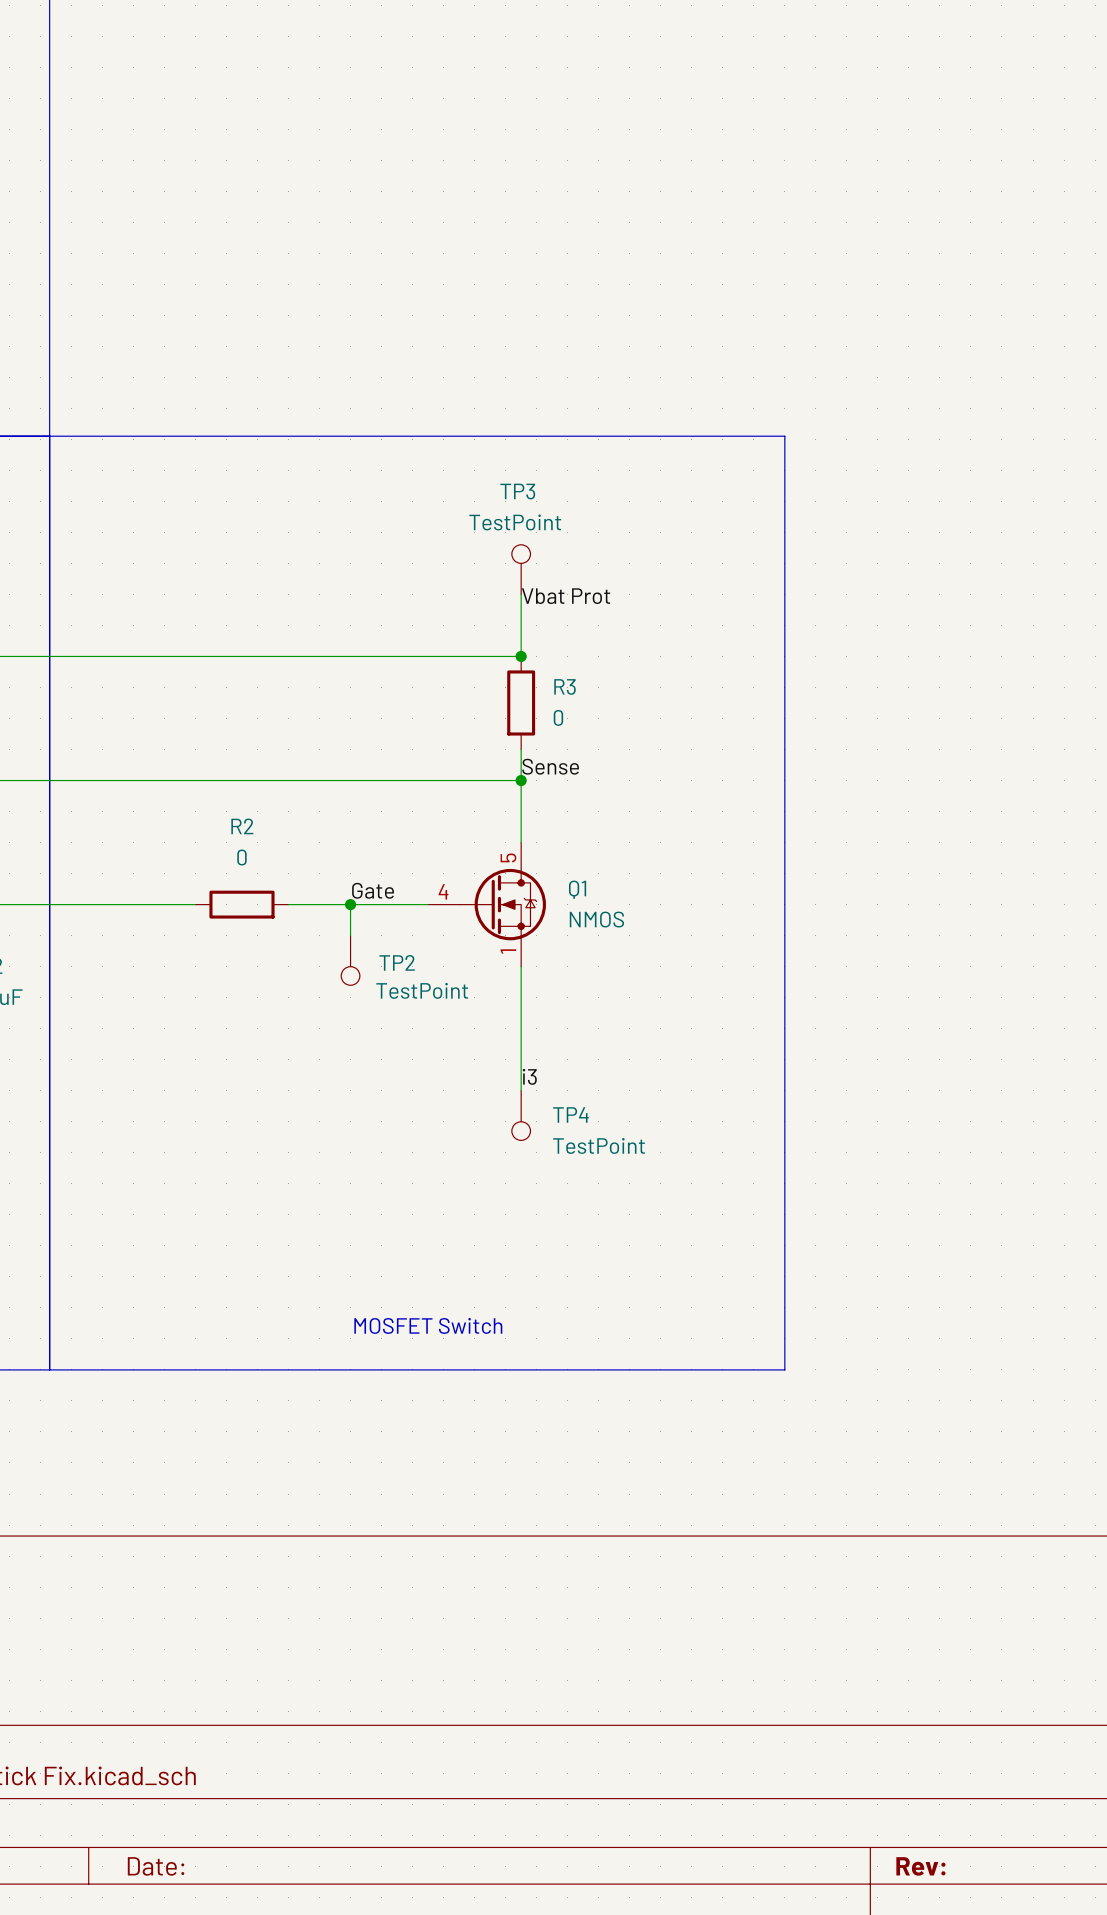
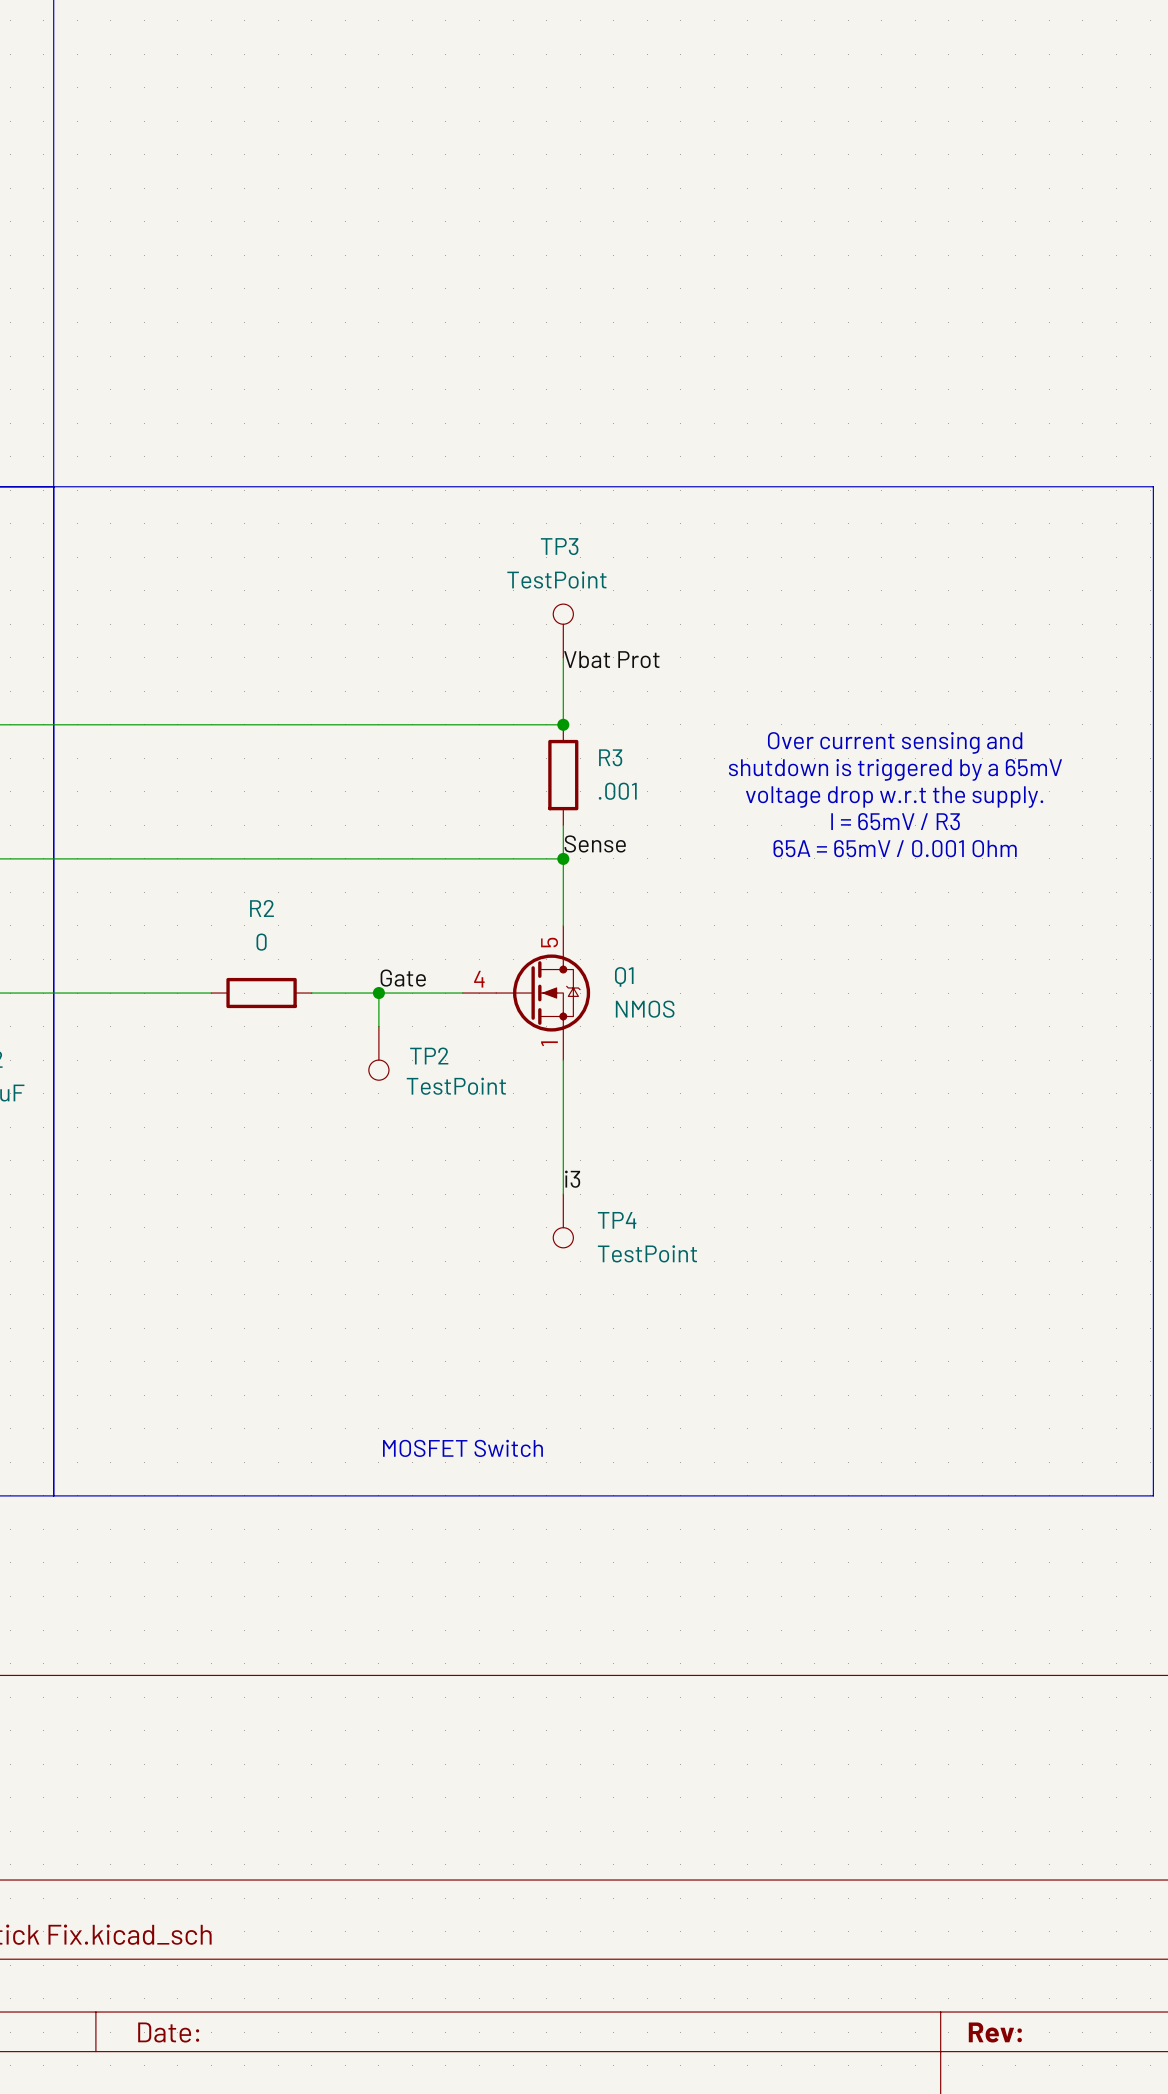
line: (784, 436) (784, 1369) -> (848, 486) (1153, 486) (1153, 1495) (848, 1495)
text: none -> Over current sensing and (895, 742)
text: none -> shutdown is triggered by a 65mV (895, 769)
R3 value: 0 (558, 717) -> .001 (617, 791)
text: none -> voltage drop w.r.t the supply. (894, 797)
text: none -> I = 65mV / R3 (895, 821)
text: none -> 65A = 65mV / 0.001 Ohm (895, 848)

